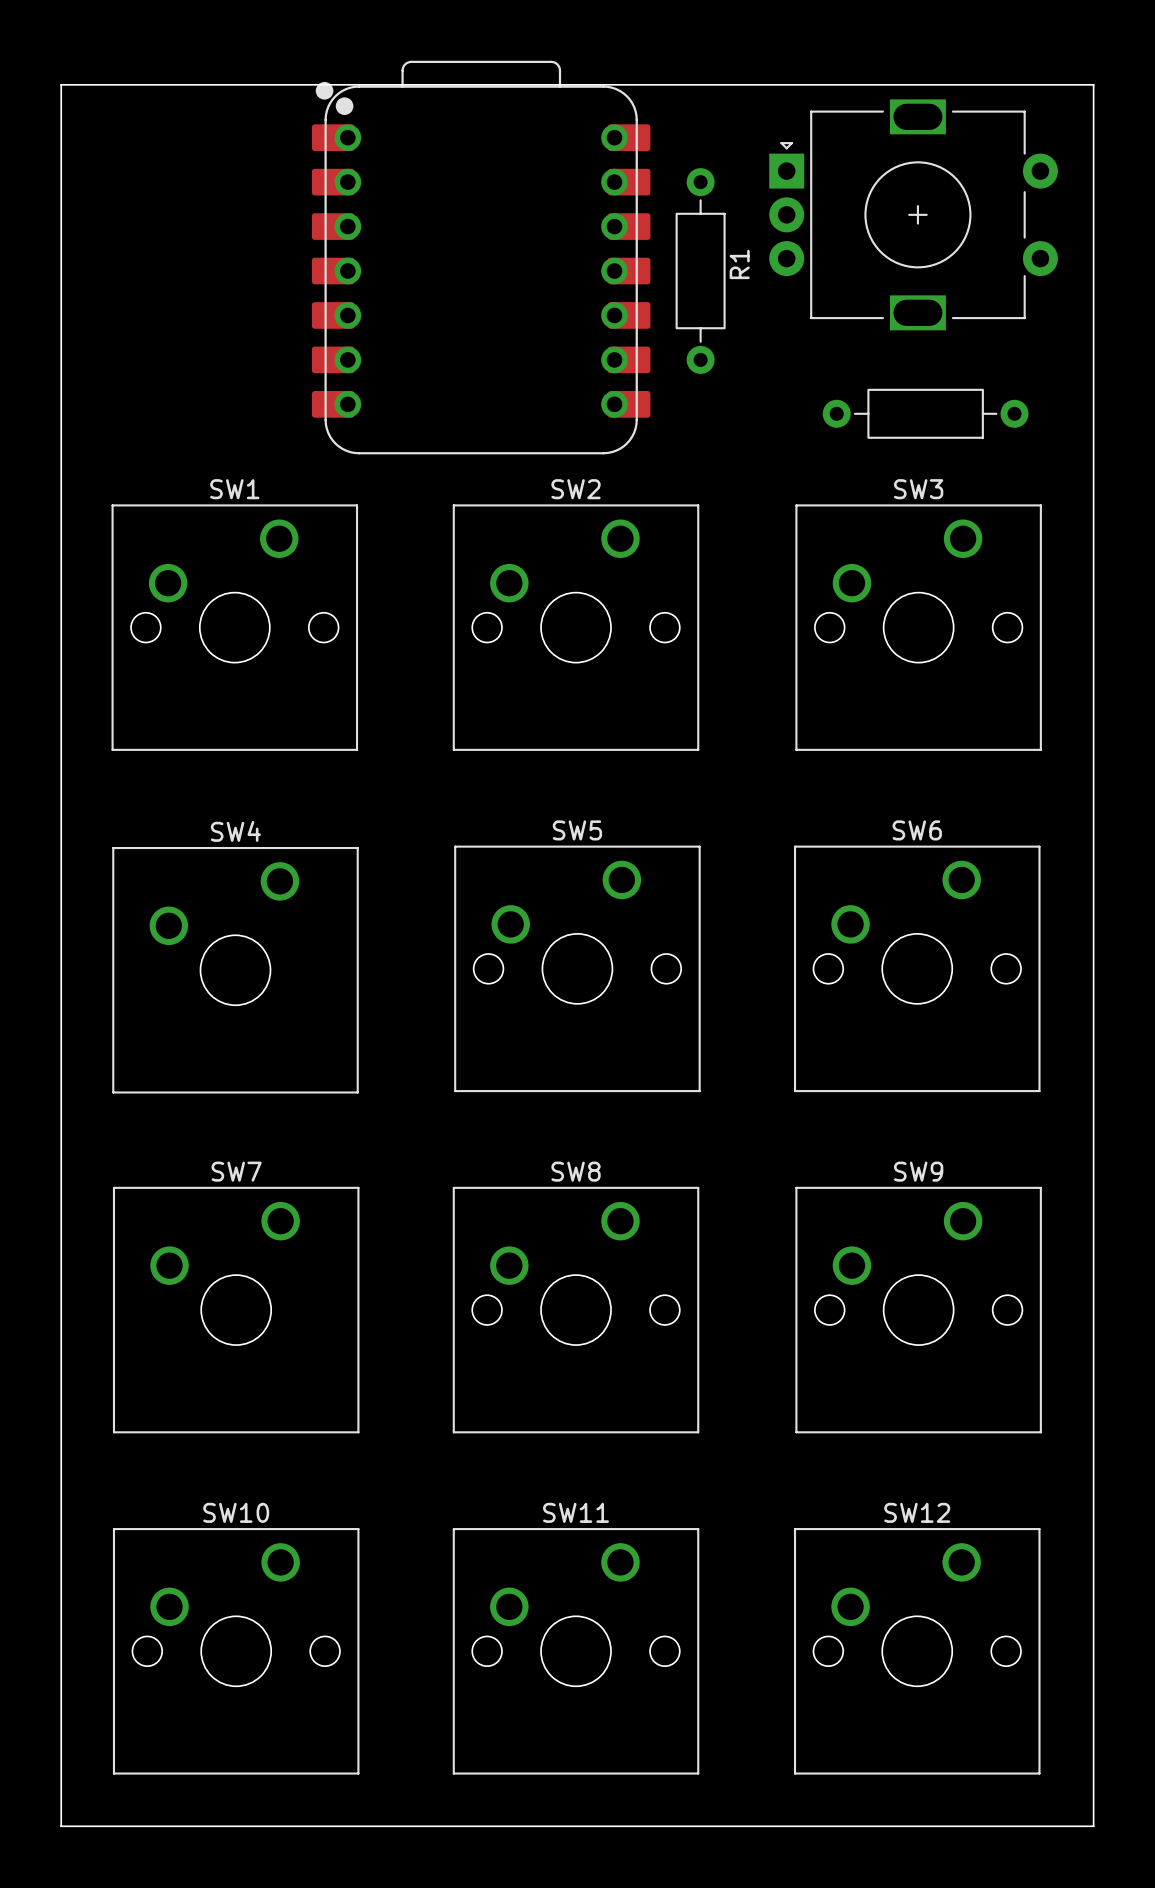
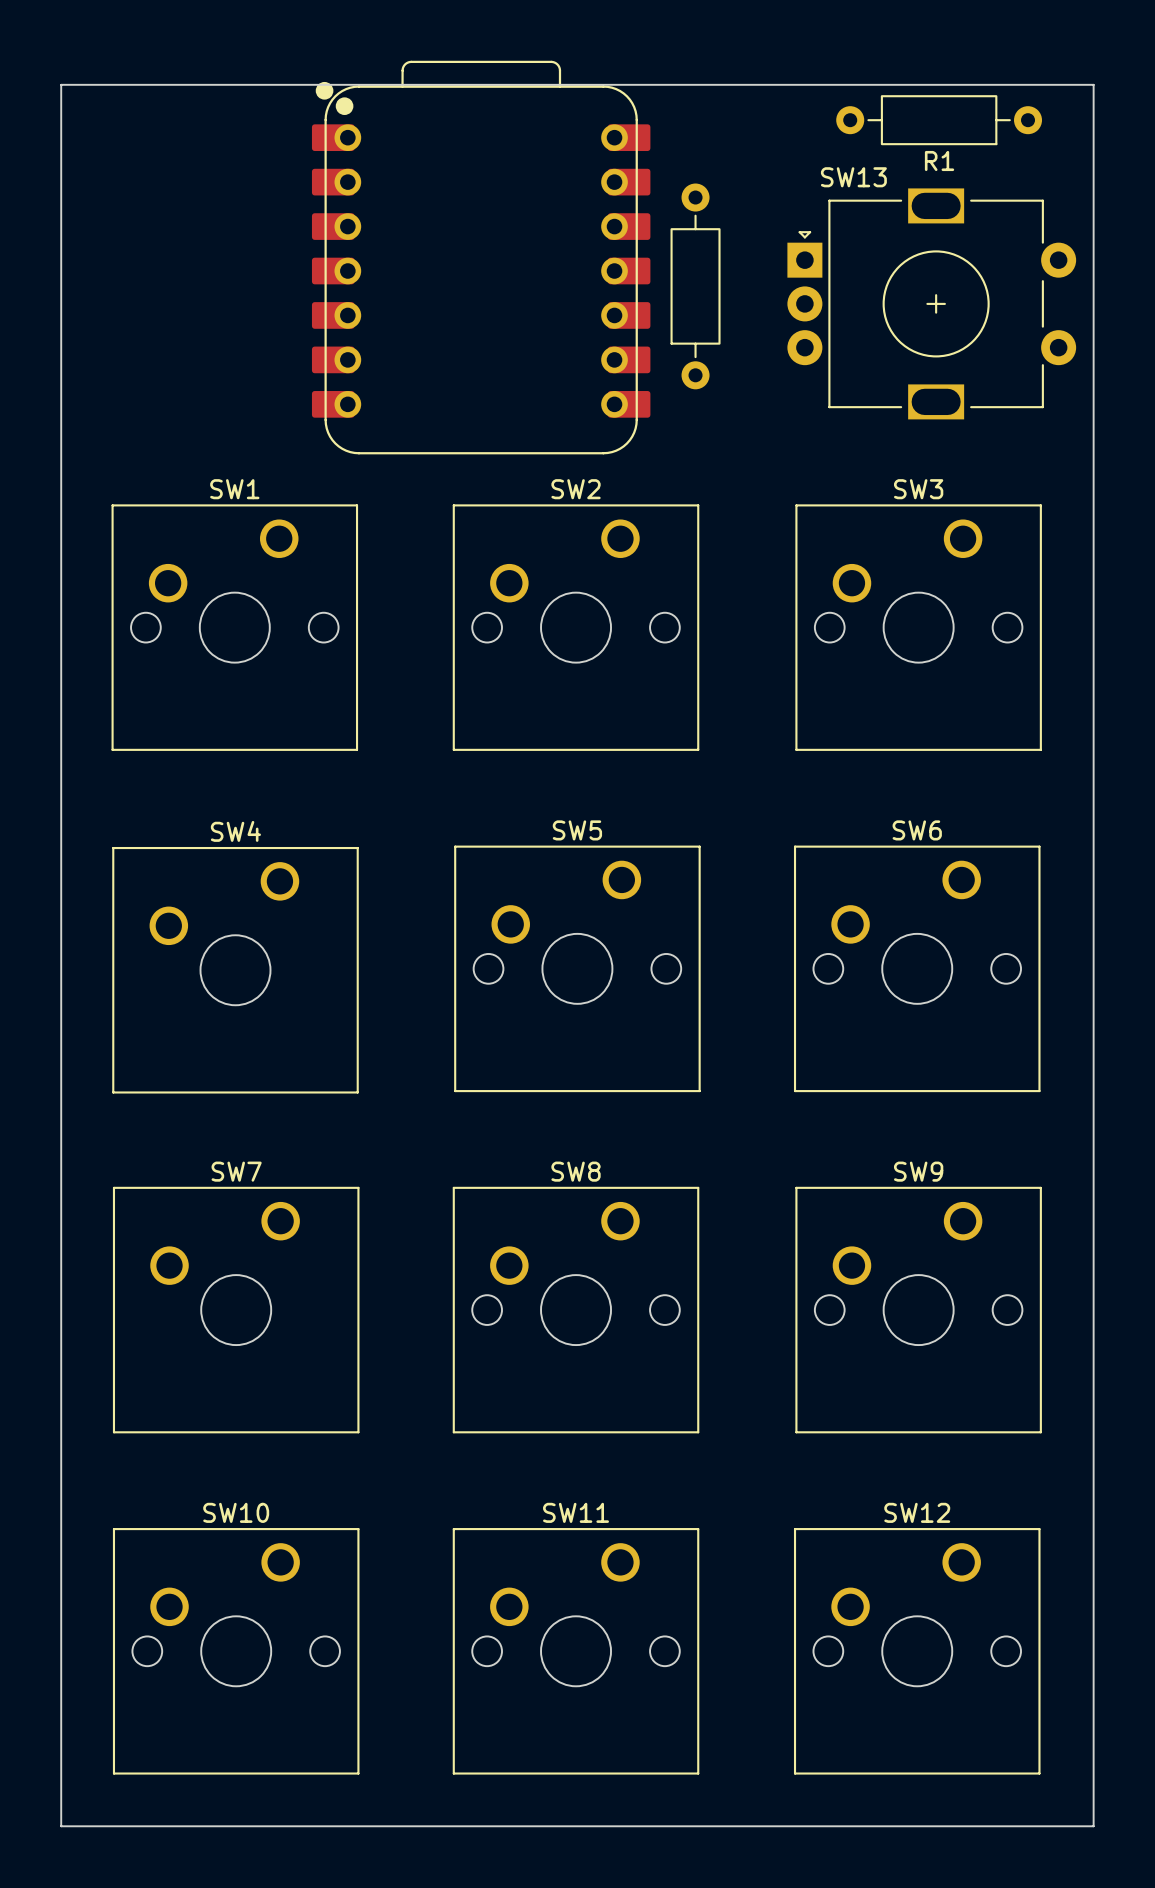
part: (913, 214) -> none
R1 rotation: 0° (700, 271) -> 90° clockwise (939, 120)
R1 position: (700, 271) -> (939, 120)
SW13: none -> (931, 303)
part rotation: 0° (925, 413) -> 90° clockwise (695, 286)
part position: (925, 413) -> (695, 286)

